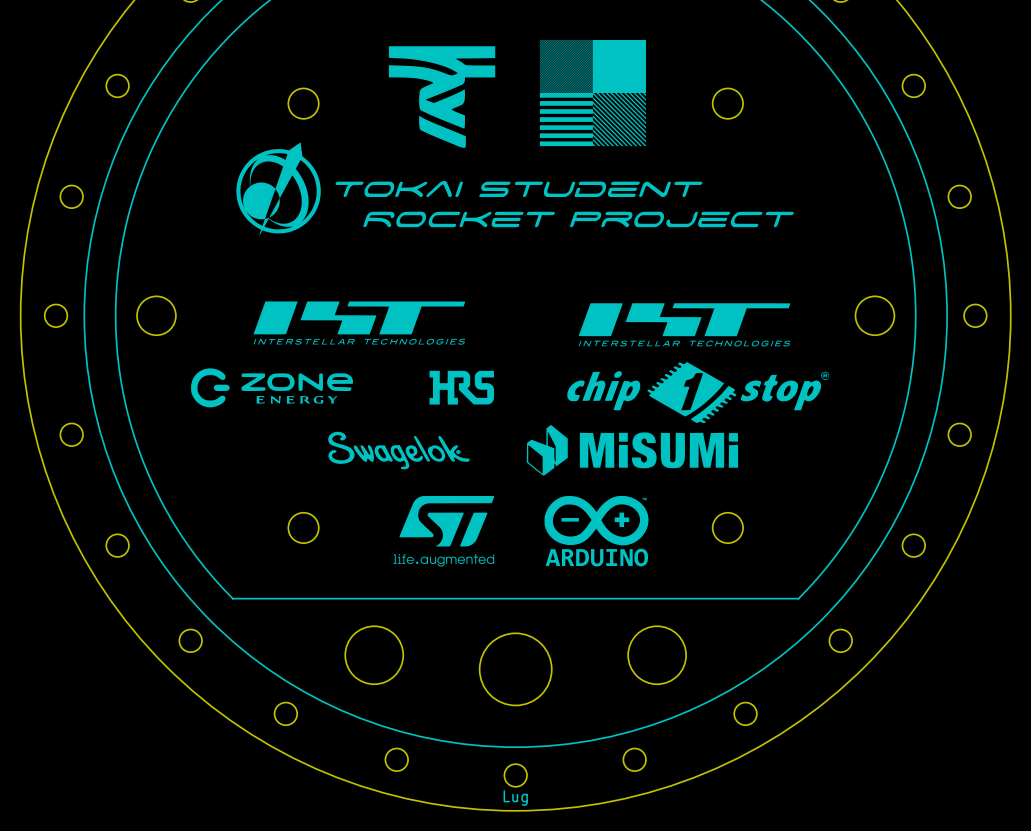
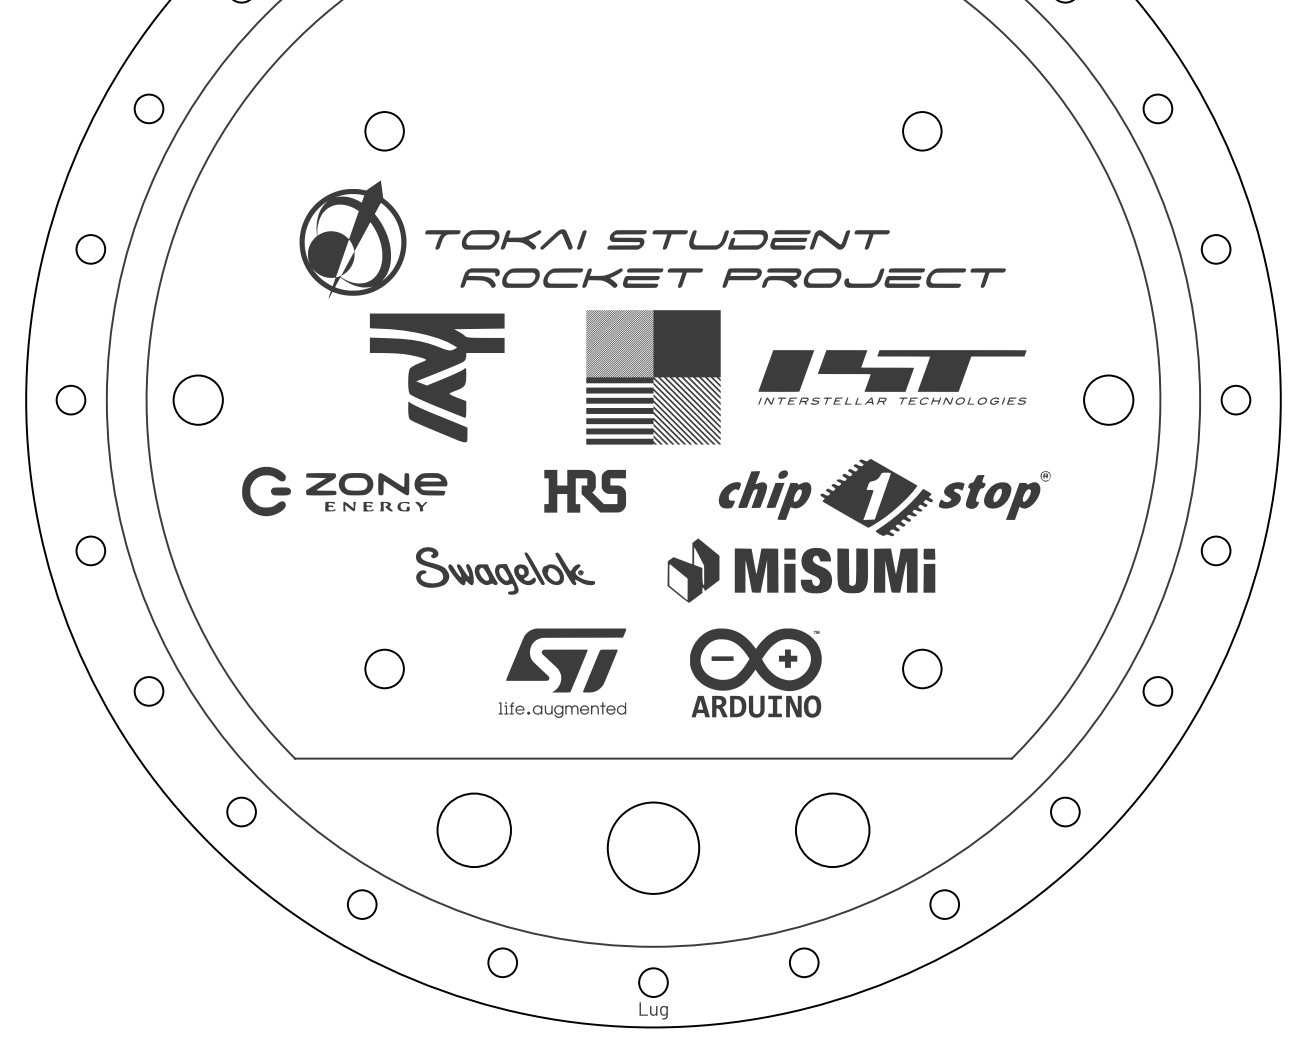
drawing: [539, 40, 646, 147] -> none
drawing: [388, 46, 496, 148] -> none
drawing: none -> [586, 310, 721, 445]
drawing: none -> [369, 313, 505, 443]
drawing: [253, 301, 466, 345] -> none
drawing position: (684, 324) -> (892, 377)

